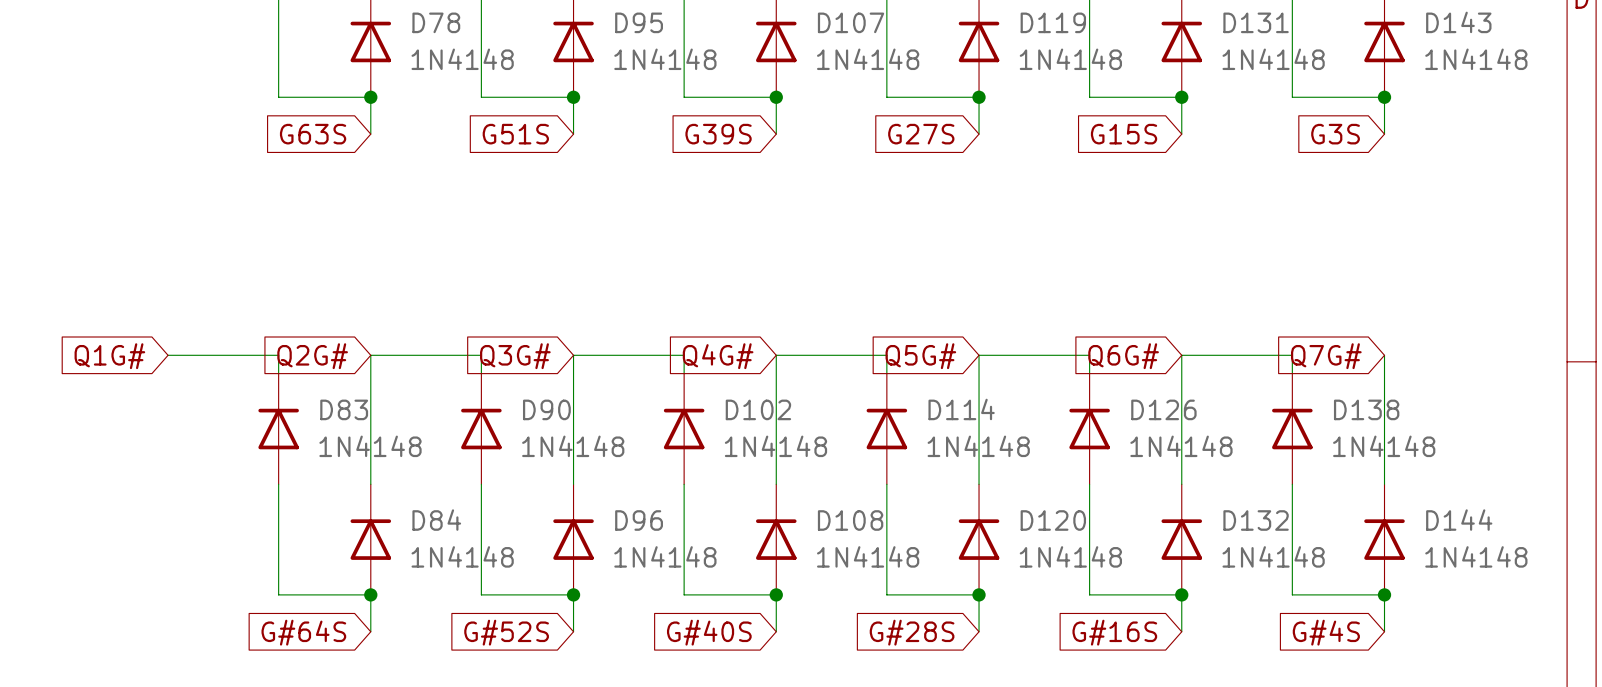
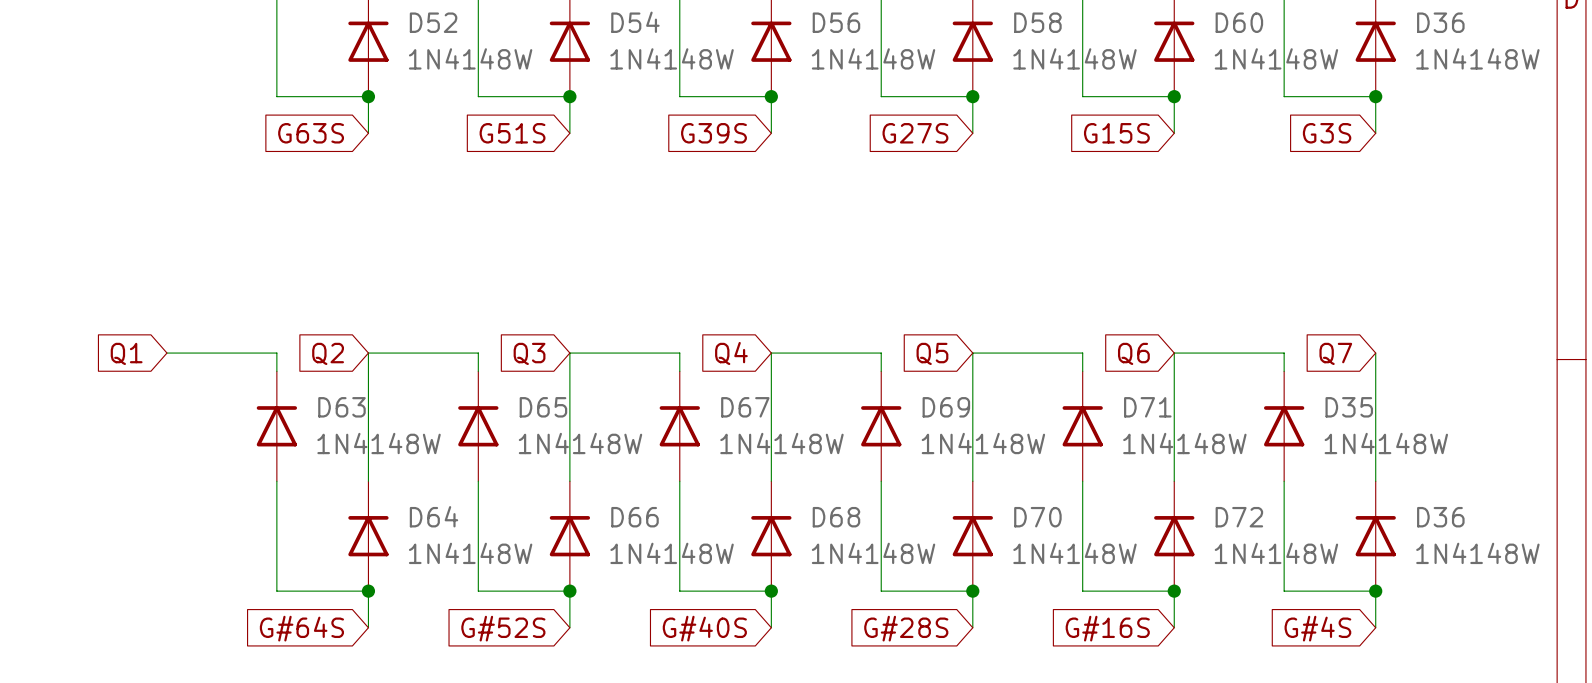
D78 name: D78 (436, 22) -> D52 (433, 22)
D95 name: D95 (639, 22) -> D54 (635, 22)
D107 name: D107 (851, 22) -> D56 (836, 22)
D119 name: D119 (1053, 22) -> D58 (1037, 22)
D131 name: D131 (1256, 22) -> D60 (1239, 22)
D143 name: D143 (1458, 22) -> D36 (1440, 22)
D78 value: 1N4148 (462, 59) -> 1N4148W (470, 58)
D95 value: 1N4148 (665, 59) -> 1N4148W (672, 58)
D107 value: 1N4148 (868, 59) -> 1N4148W (873, 58)
D119 value: 1N4148 (1070, 59) -> 1N4148W (1074, 58)
D131 value: 1N4148 (1273, 59) -> 1N4148W (1276, 58)
D143 value: 1N4148 (1476, 59) -> 1N4148W (1477, 58)
global label: Q1G# (109, 356) -> Q1 (126, 353)
global label: Q2G# (312, 356) -> Q2 (328, 353)
global label: Q3G# (515, 356) -> Q3 (529, 353)
global label: Q4G# (718, 356) -> Q4 (731, 353)
global label: Q5G# (920, 356) -> Q5 (932, 353)
global label: Q6G# (1123, 356) -> Q6 (1133, 353)
global label: Q7G# (1326, 356) -> Q7 (1335, 353)
D83 name: D83 (344, 409) -> D63 (341, 407)
D90 name: D90 (546, 409) -> D65 (543, 407)
D102 name: D102 (758, 409) -> D67 (745, 407)
D114 name: D114 (961, 409) -> D69 (946, 407)
D126 name: D126 (1163, 409) -> D71 (1147, 407)
D138 name: D138 (1366, 409) -> D35 (1349, 407)
D83 value: 1N4148 (370, 446) -> 1N4148W (379, 443)
D90 value: 1N4148 (573, 446) -> 1N4148W (580, 443)
D102 value: 1N4148 (775, 446) -> 1N4148W (781, 443)
D114 value: 1N4148 (978, 446) -> 1N4148W (983, 443)
D126 value: 1N4148 (1181, 446) -> 1N4148W (1184, 443)
D138 value: 1N4148 (1384, 446) -> 1N4148W (1386, 443)
D84 name: D84 (436, 520) -> D64 (433, 516)
D96 name: D96 (639, 520) -> D66 (635, 517)
D108 name: D108 (850, 520) -> D68 (836, 517)
D120 name: D120 (1053, 520) -> D70 (1037, 517)
D132 name: D132 (1256, 520) -> D72 (1239, 517)
D144 name: D144 (1459, 520) -> D36 (1440, 517)
D84 value: 1N4148 (462, 556) -> 1N4148W (470, 553)
D96 value: 1N4148 (665, 556) -> 1N4148W (672, 553)
D108 value: 1N4148 (868, 556) -> 1N4148W (873, 553)
D120 value: 1N4148 (1070, 556) -> 1N4148W (1074, 553)
D132 value: 1N4148 (1273, 556) -> 1N4148W (1276, 553)
D144 value: 1N4148 (1476, 556) -> 1N4148W (1477, 553)

